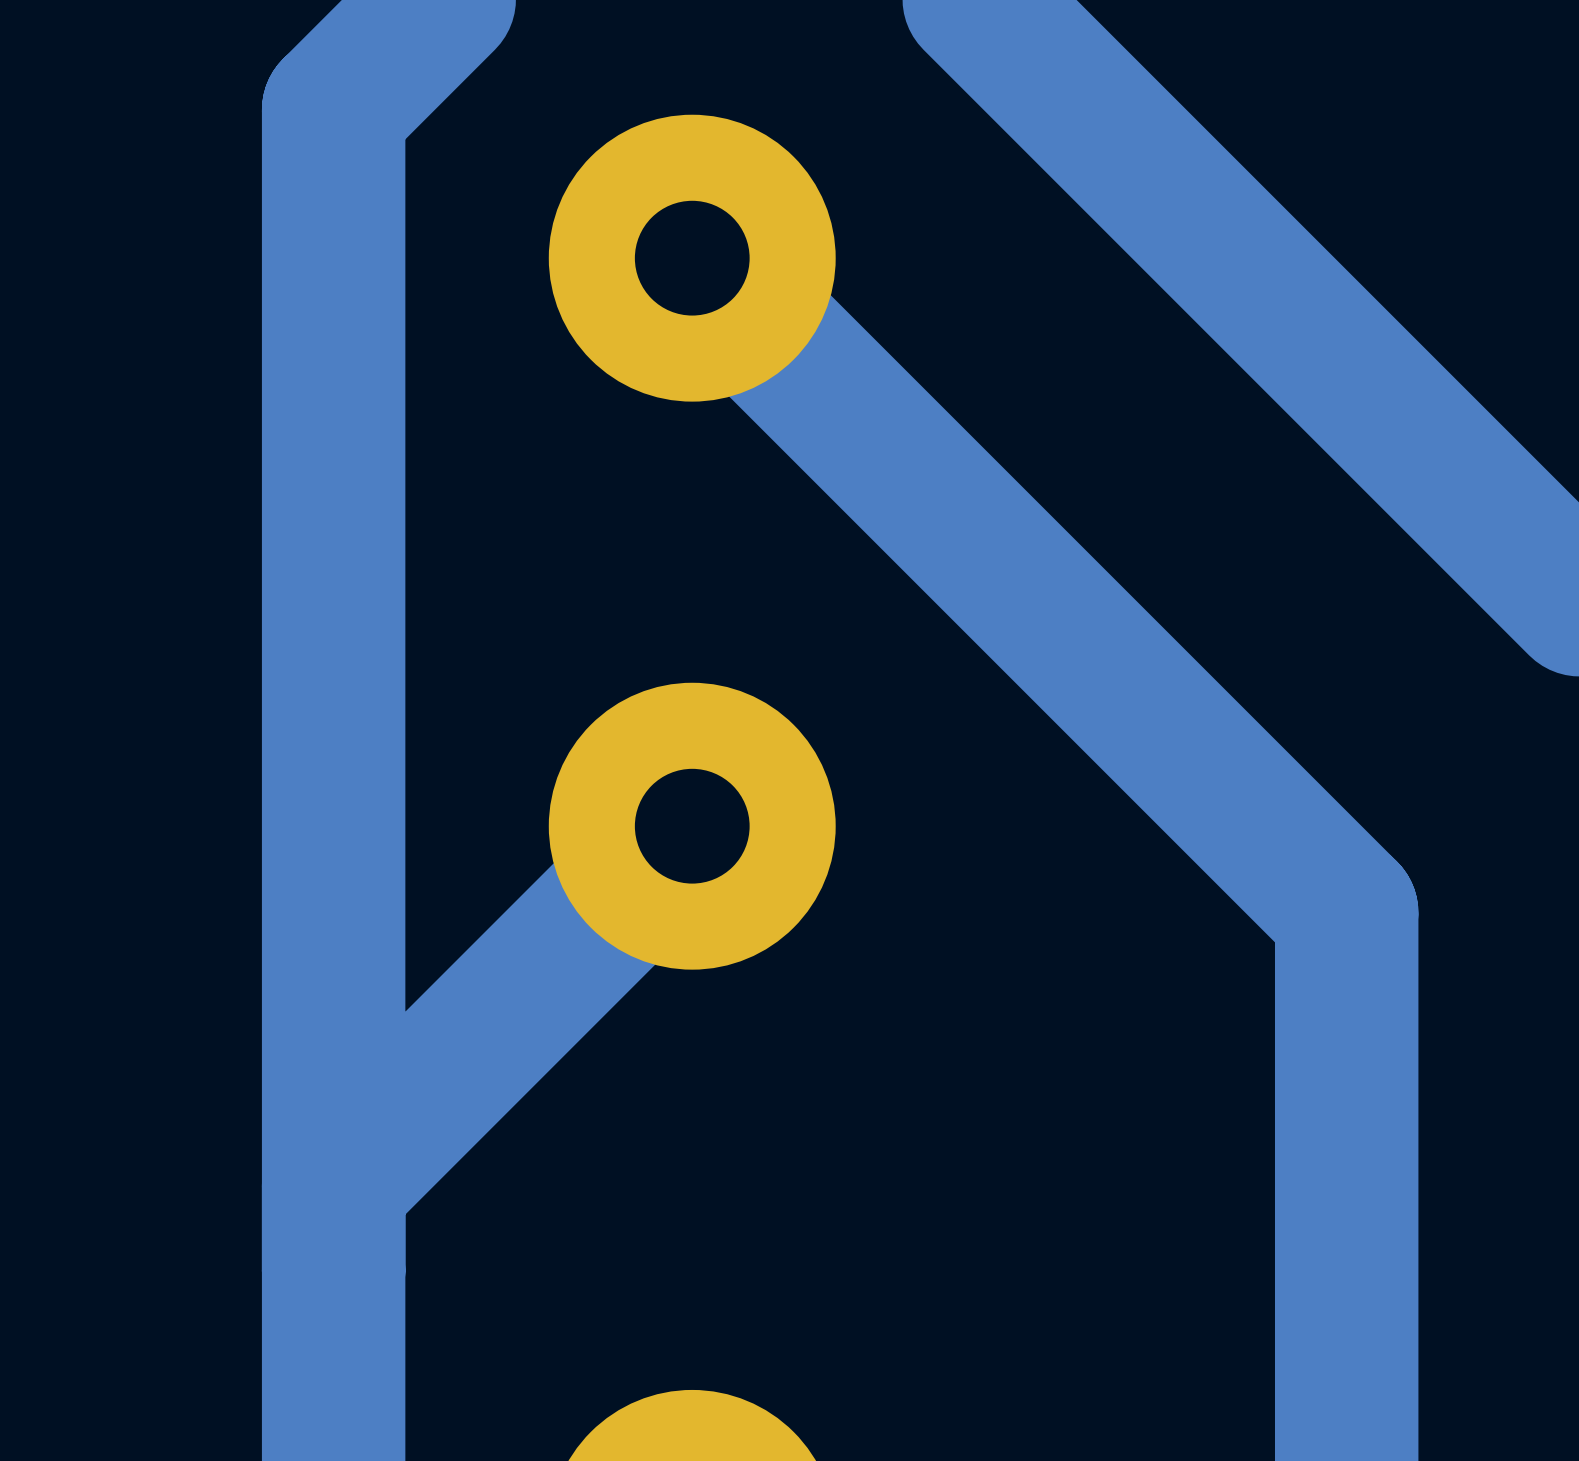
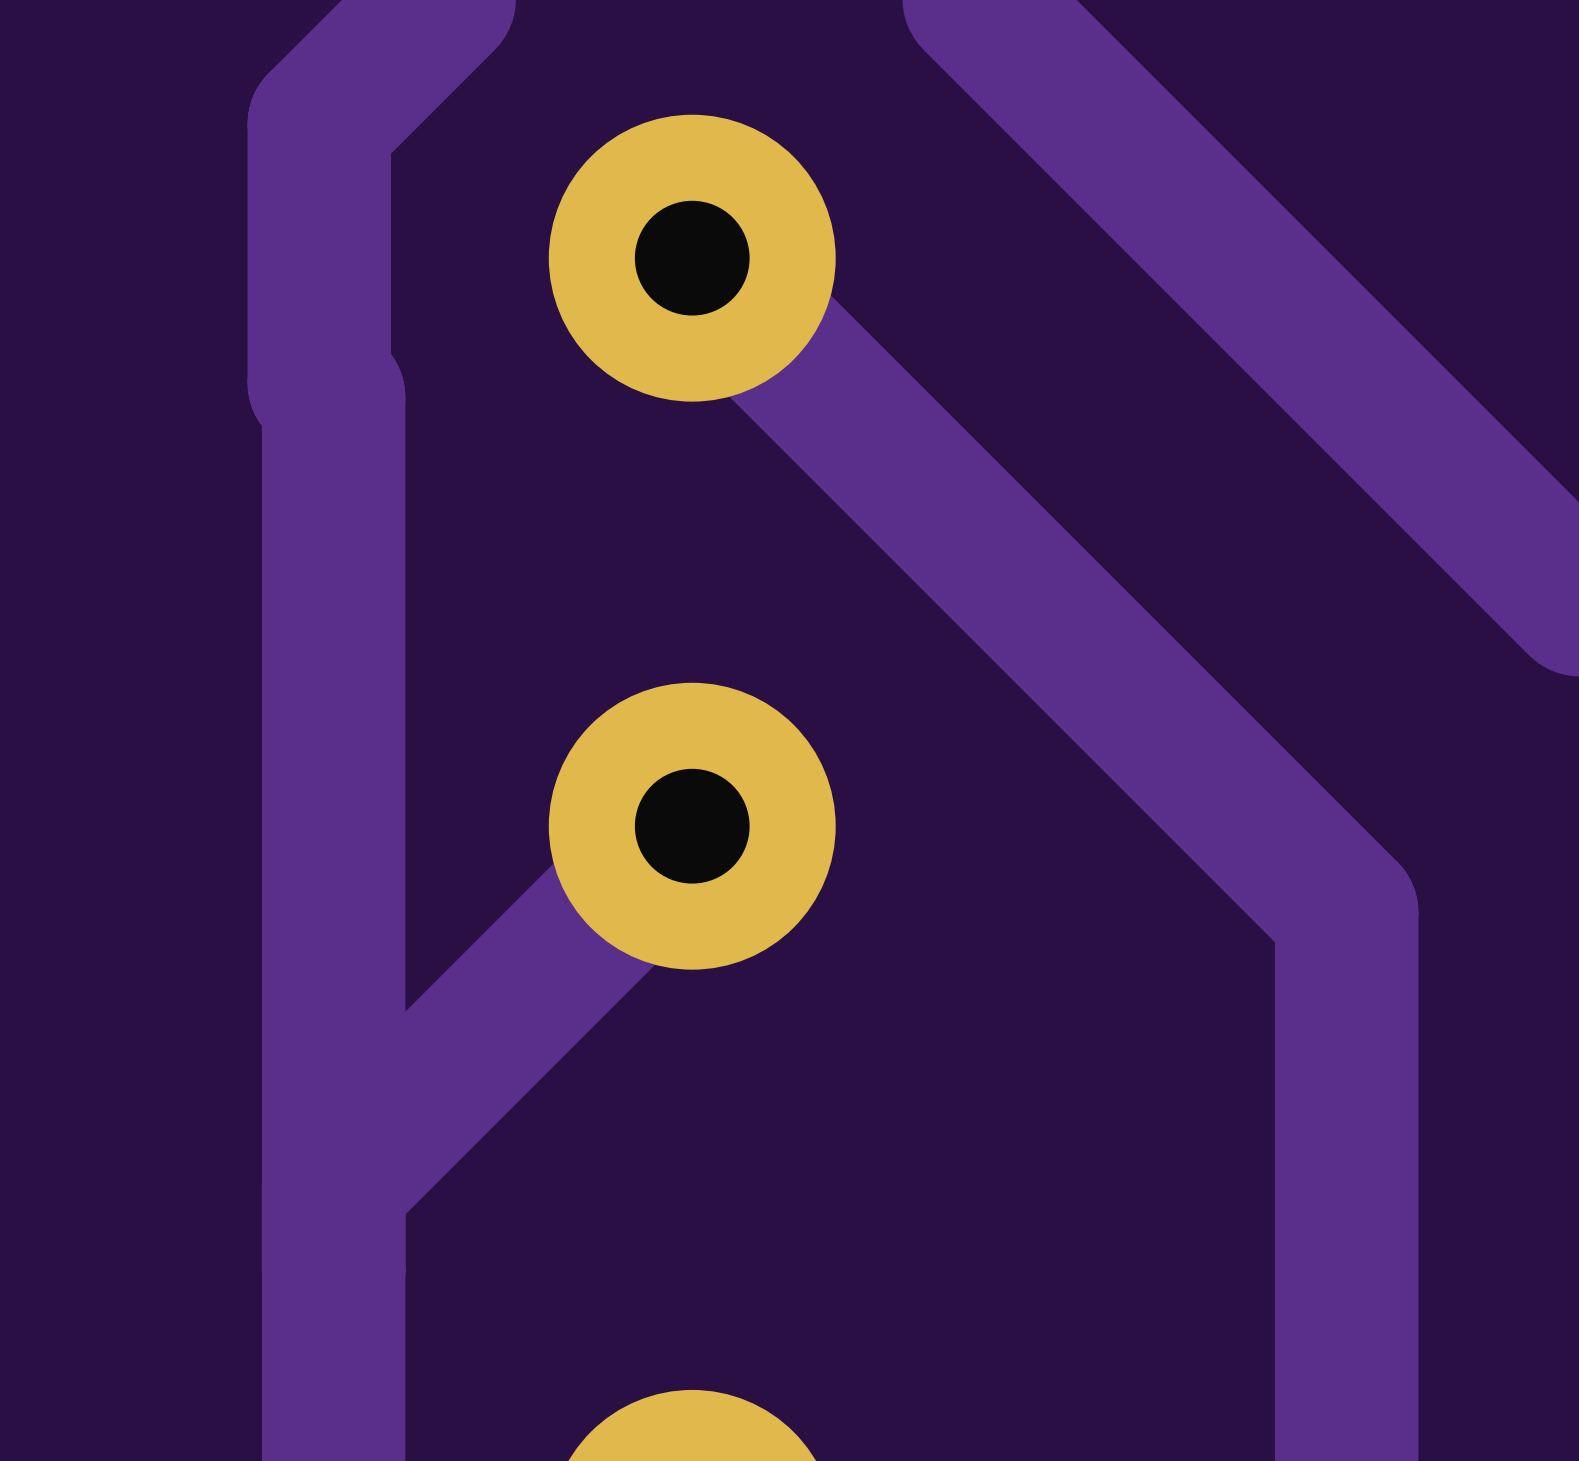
track: (333, 109) (333, 397) -> (333, 109) (319, 123) (319, 382) (333, 397)

